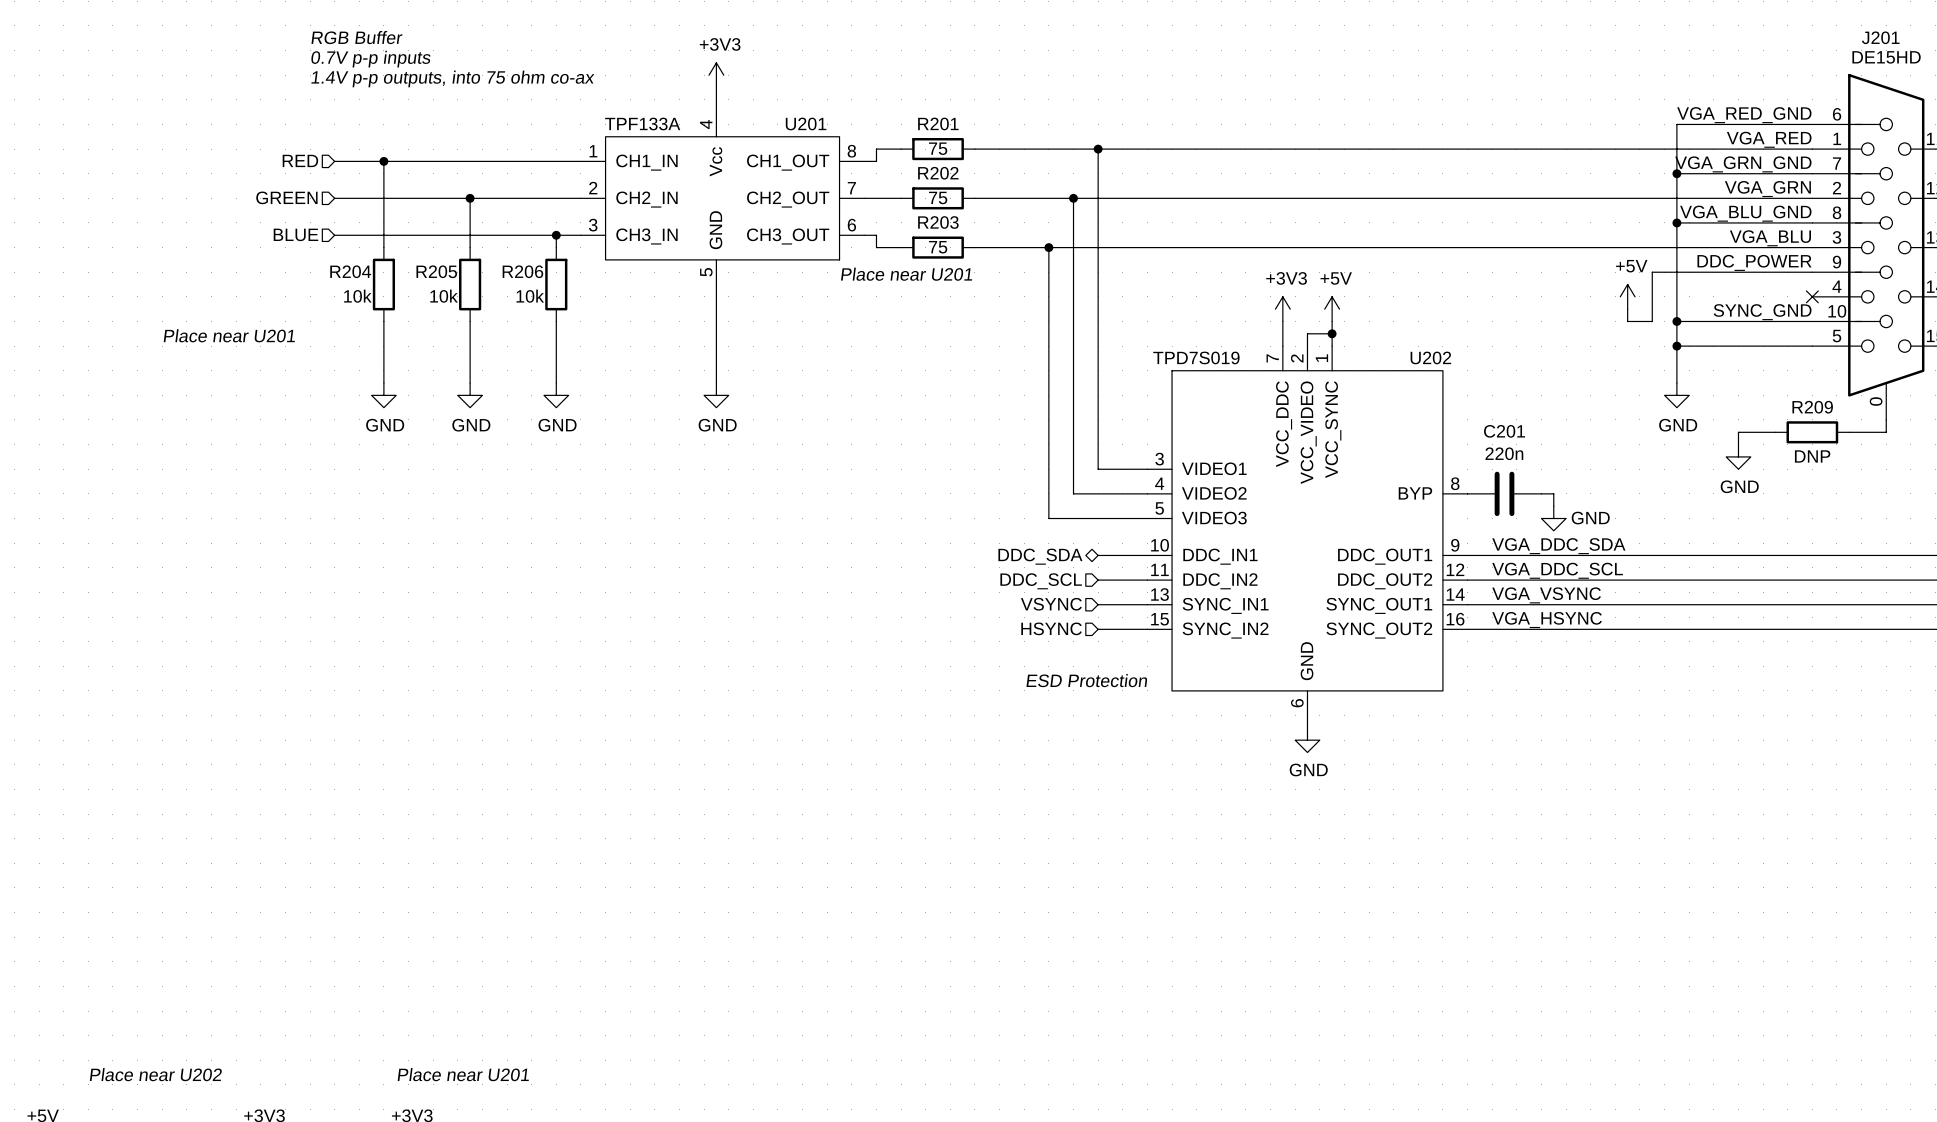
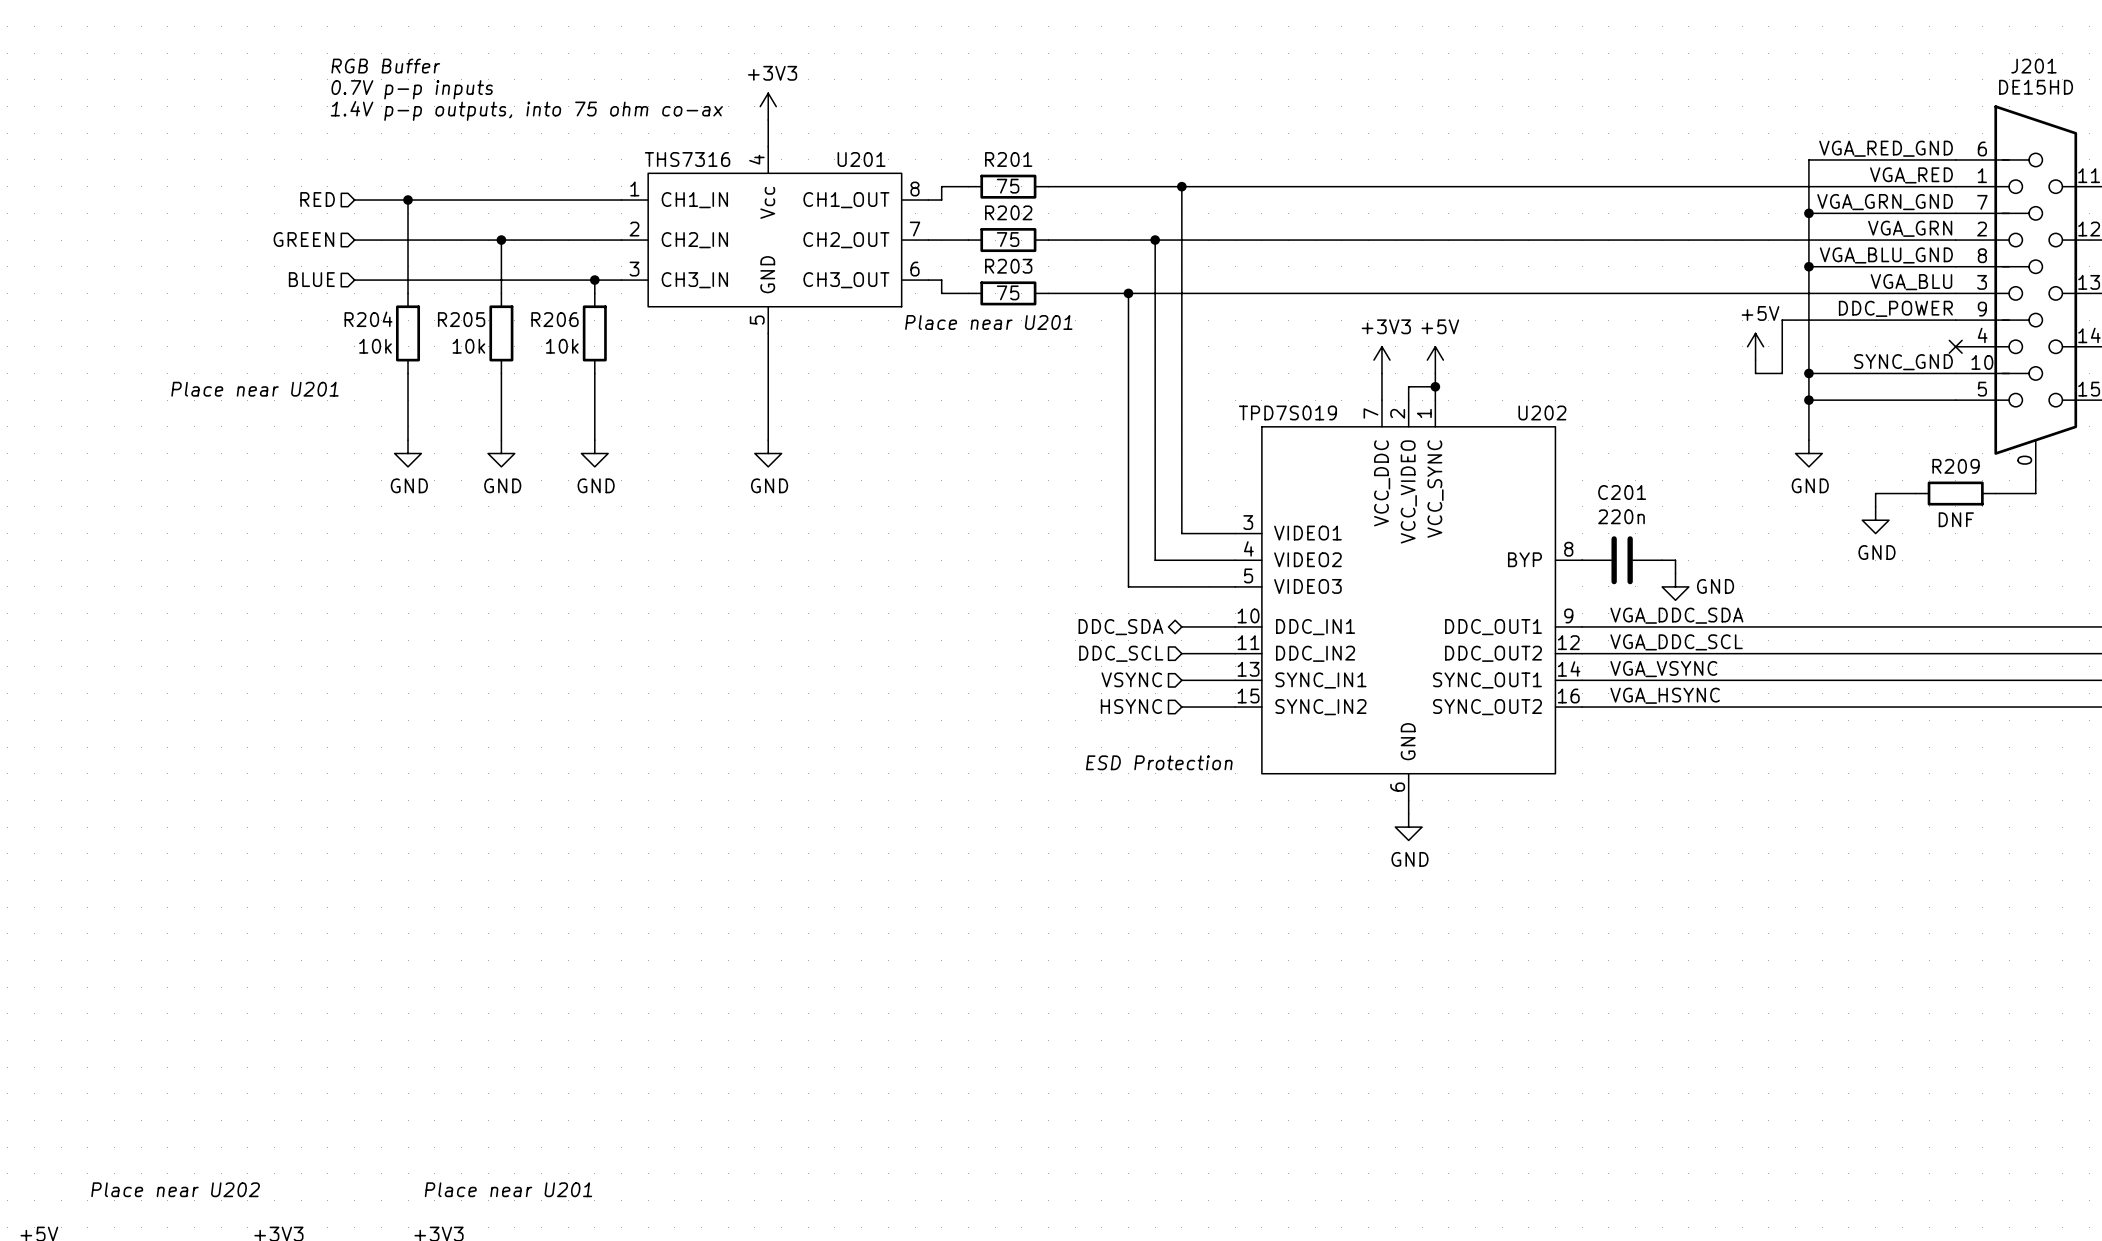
U201 value: TPF133A (642, 123) -> THS7316 (687, 159)
R209 value: DNP (1812, 456) -> DNF (1956, 519)

